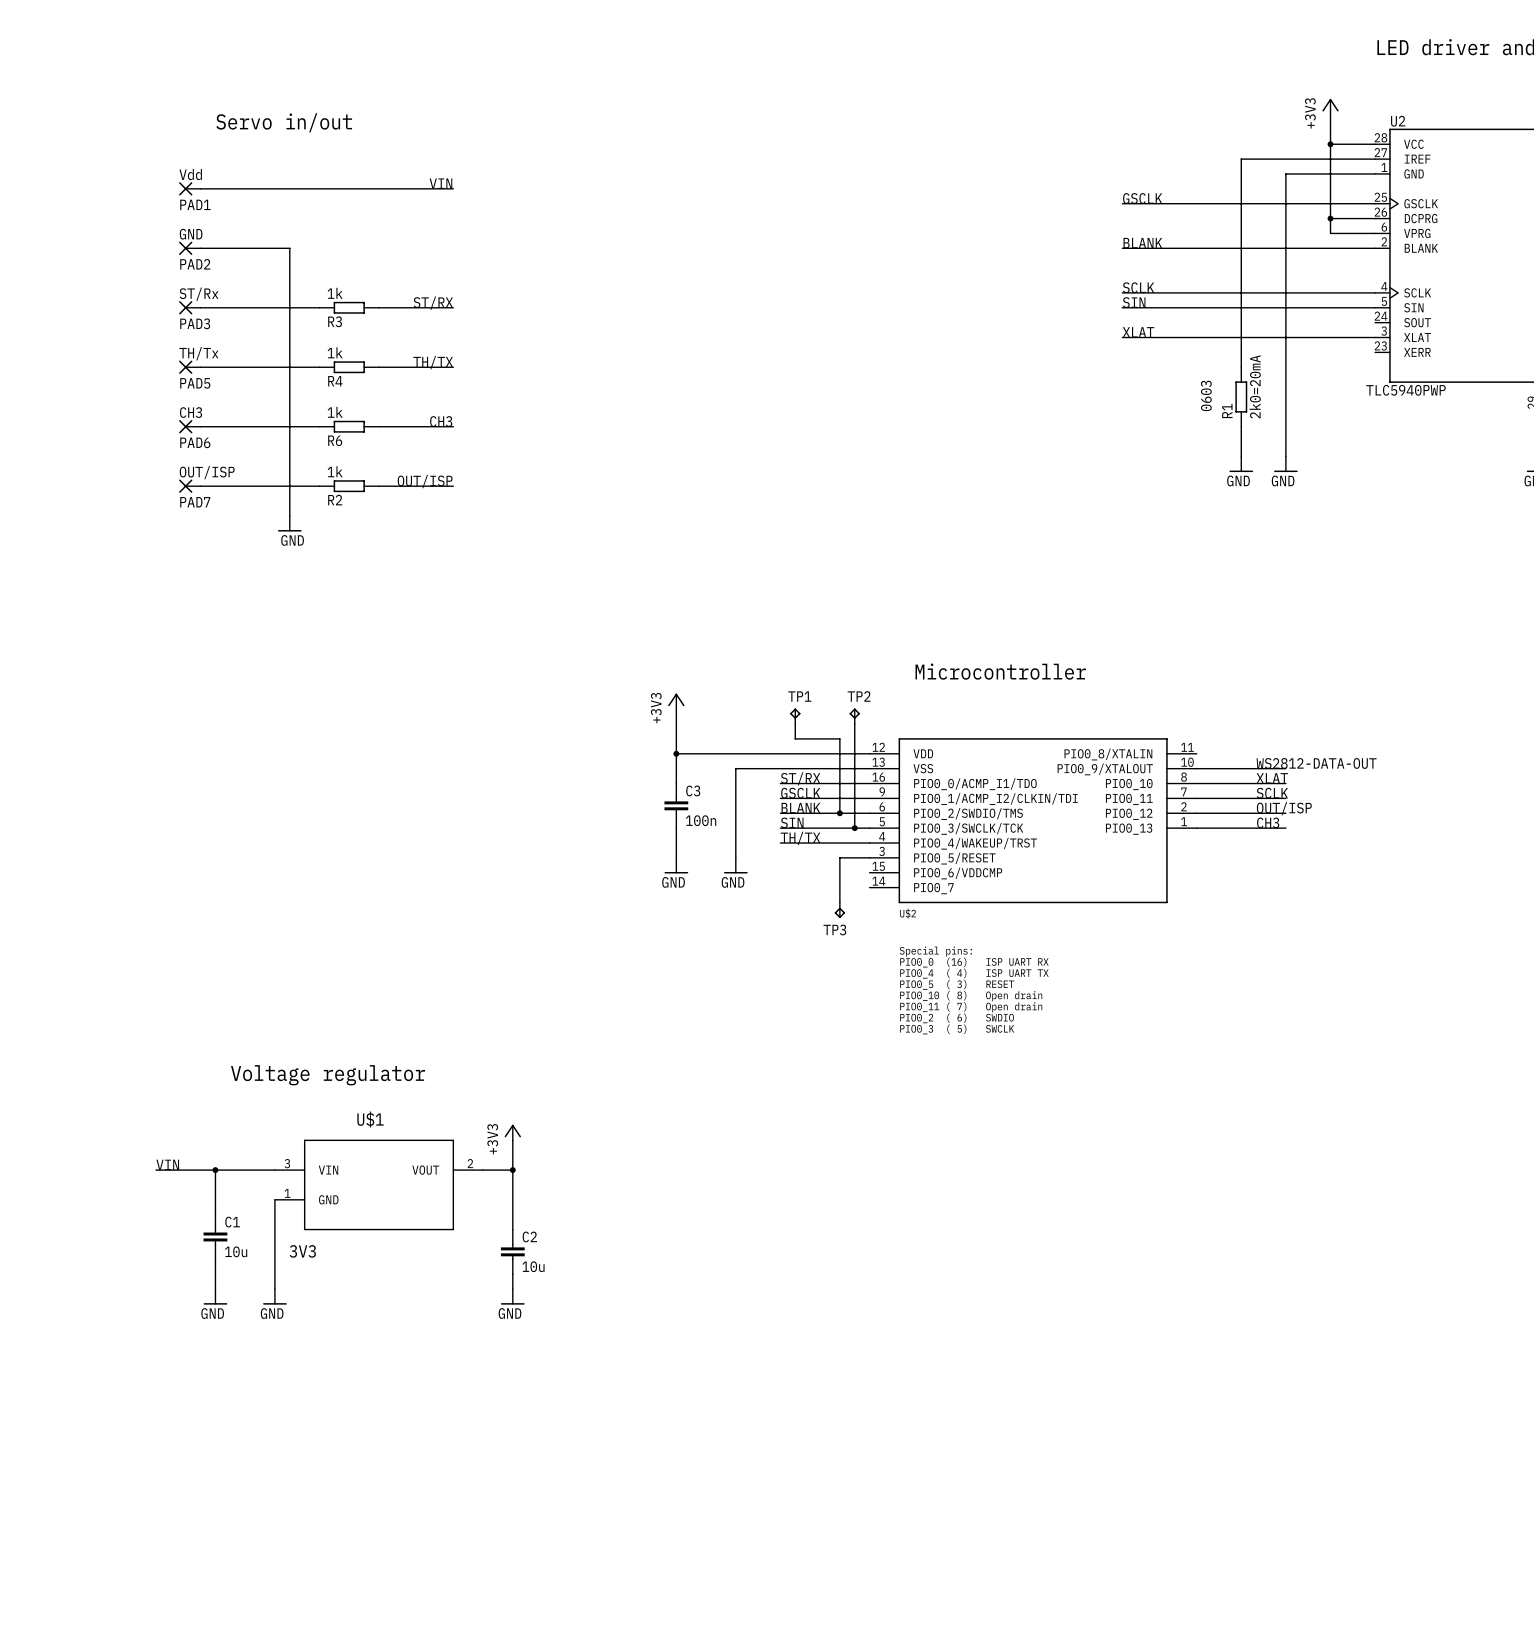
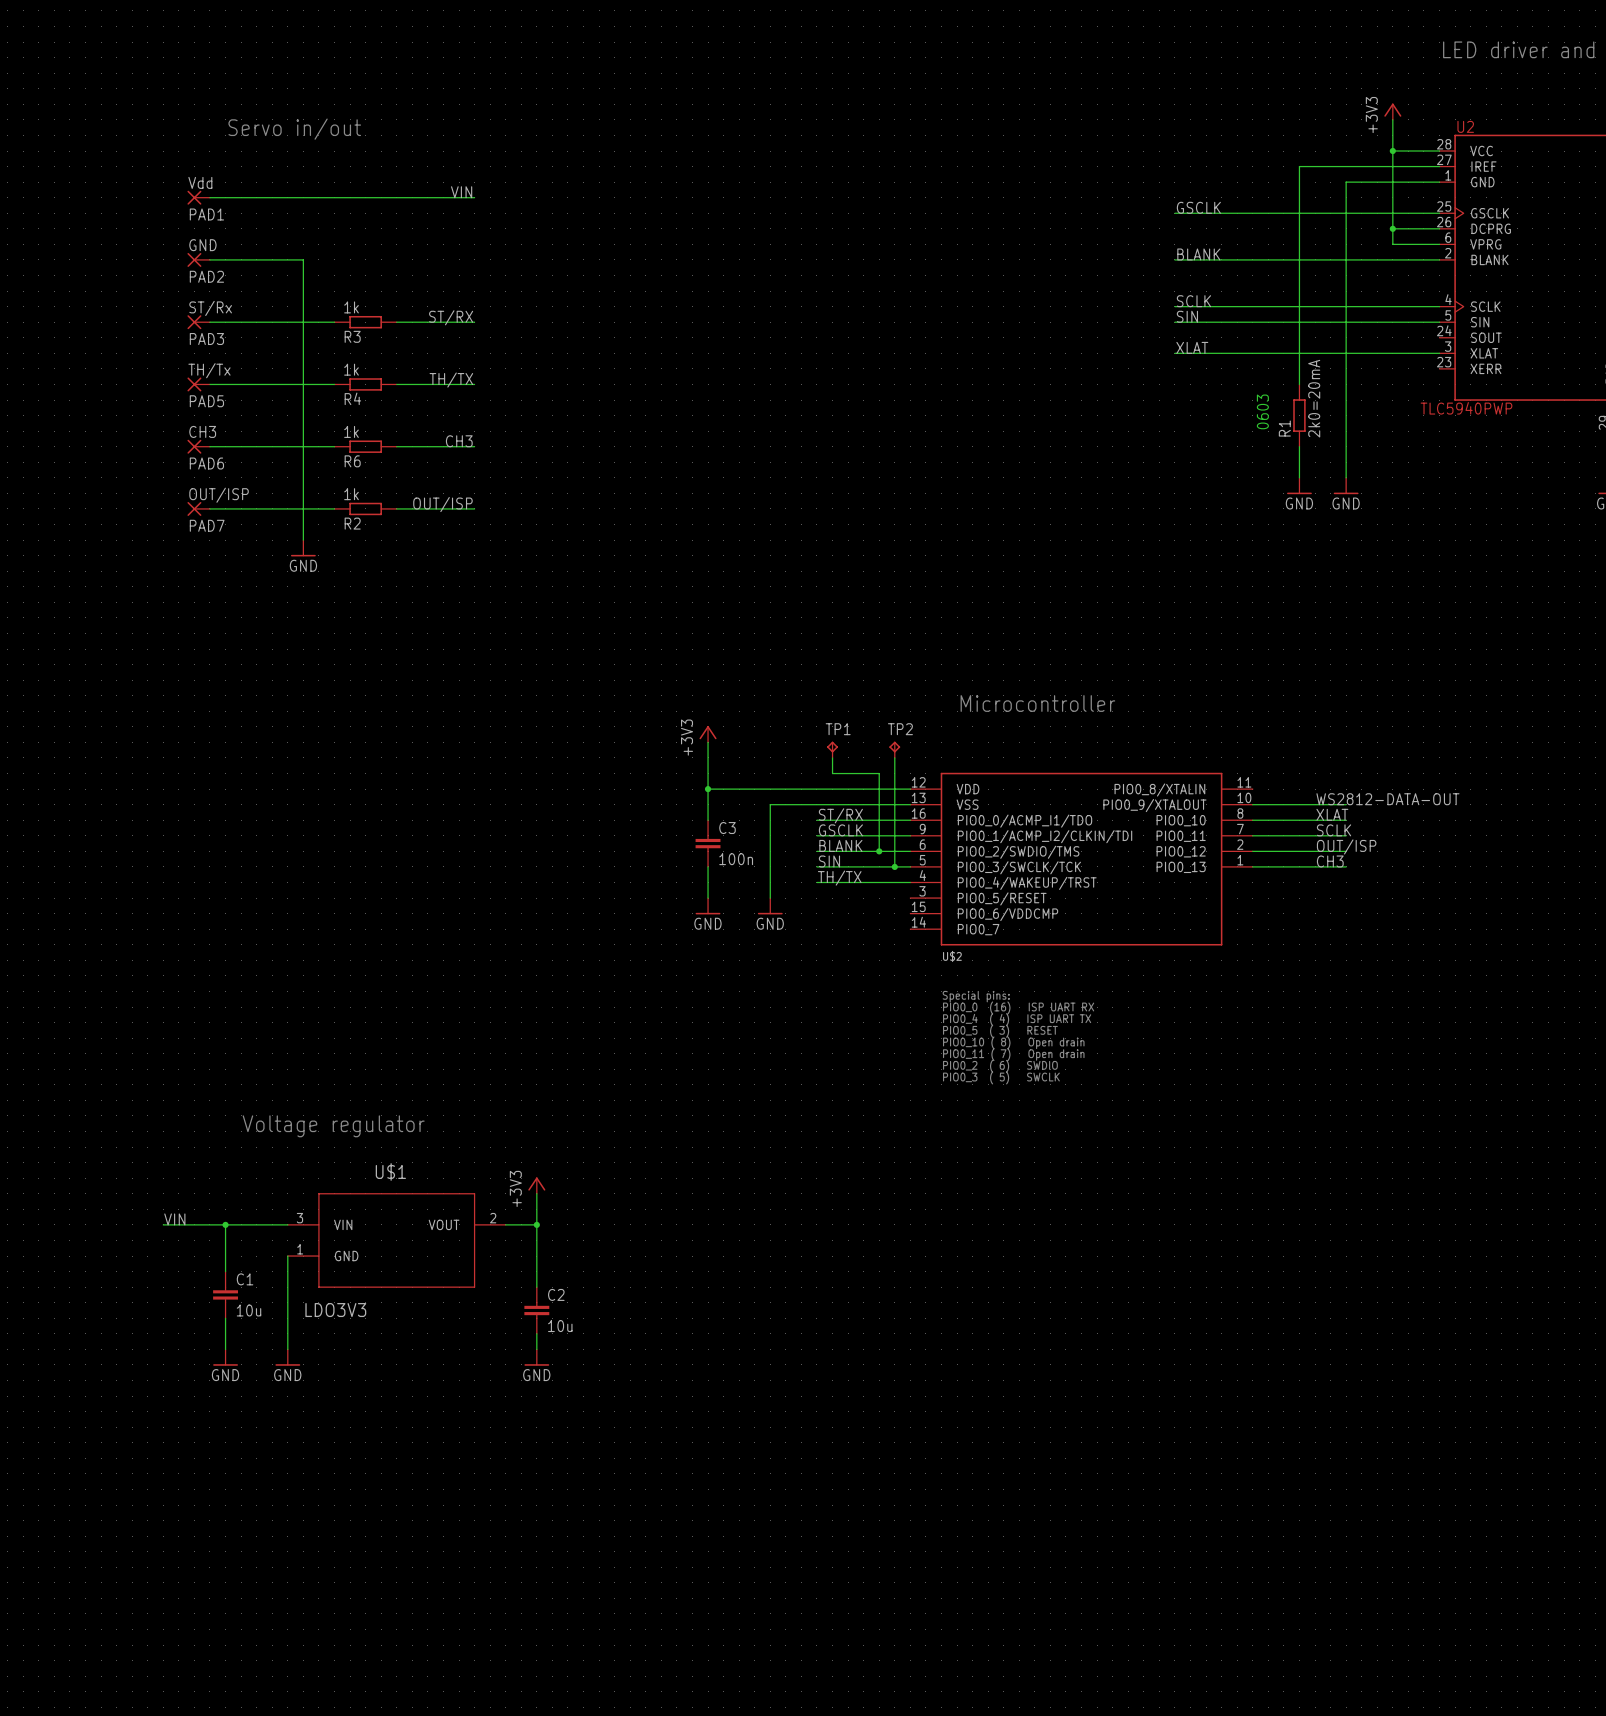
wire: (869, 857) (839, 857) (839, 902) -> none
TP3: (839, 910) -> none
U$1 value: 3V3 (302, 1251) -> LDO3V3 (335, 1310)

